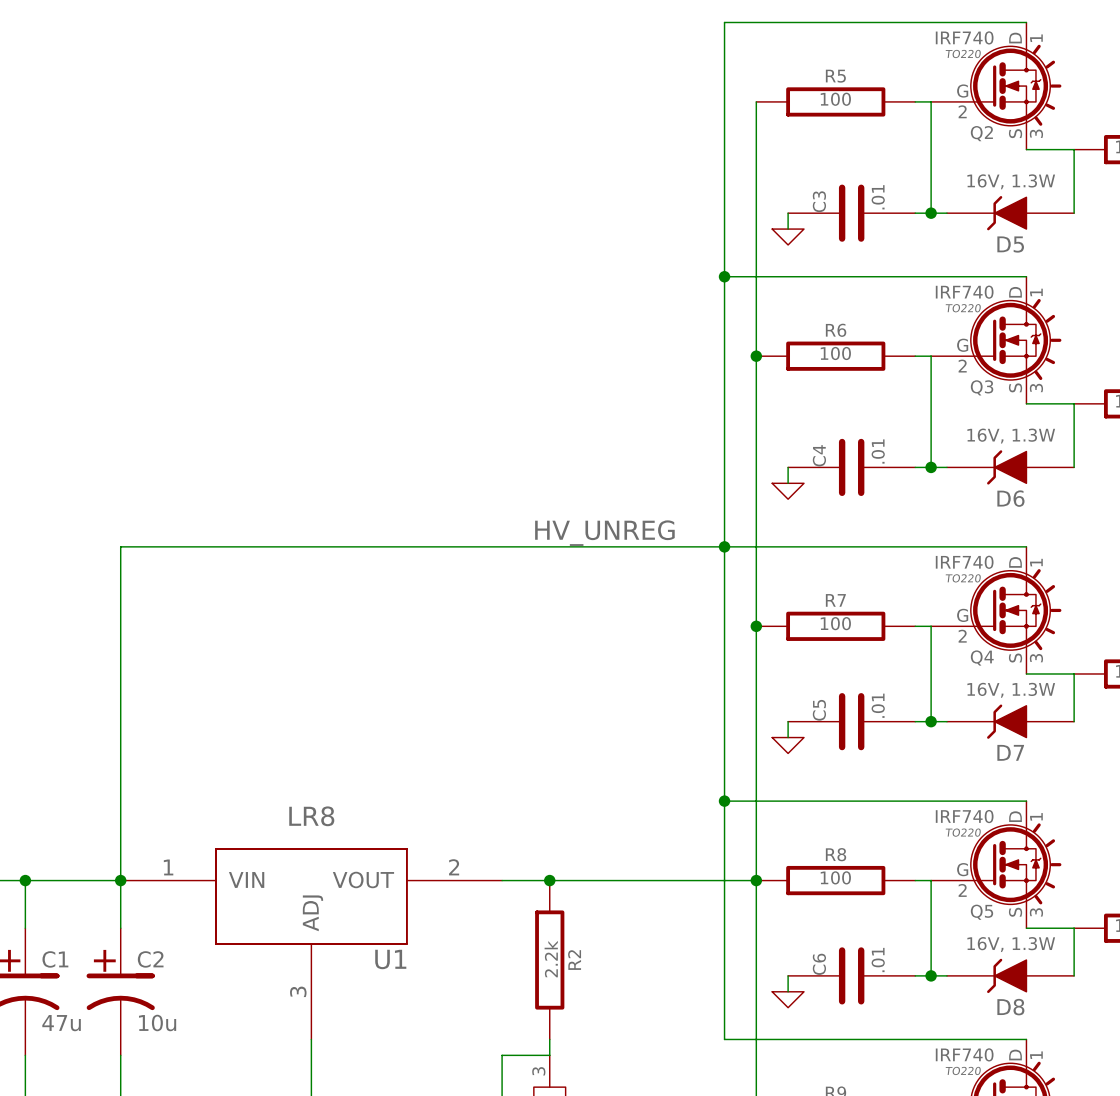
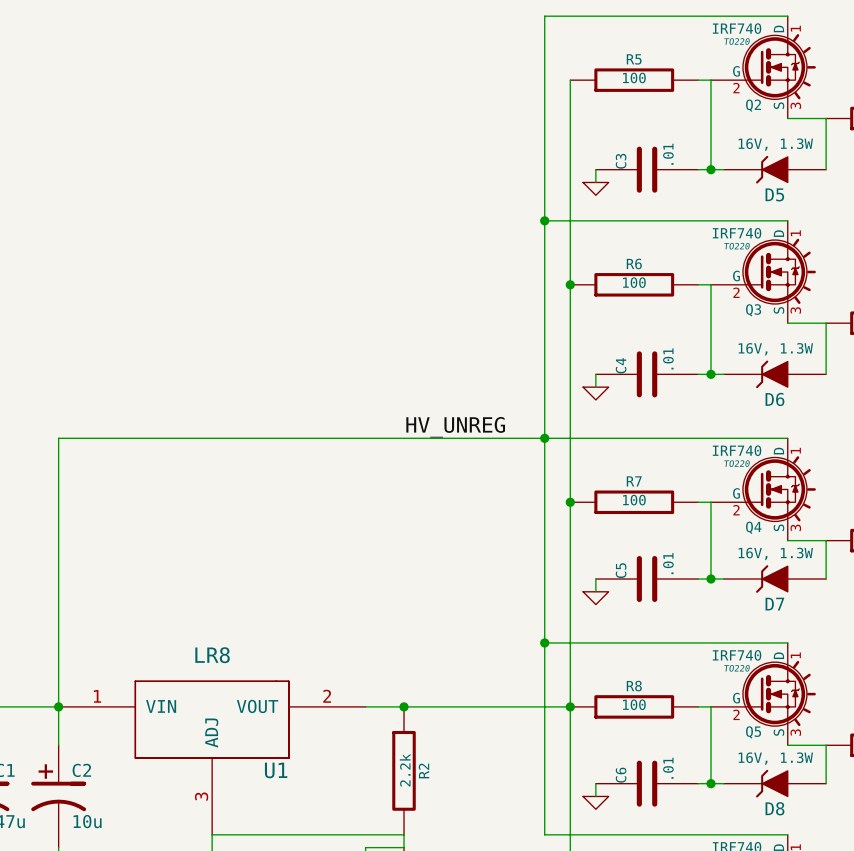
wire: none -> (212, 834) (404, 834)

